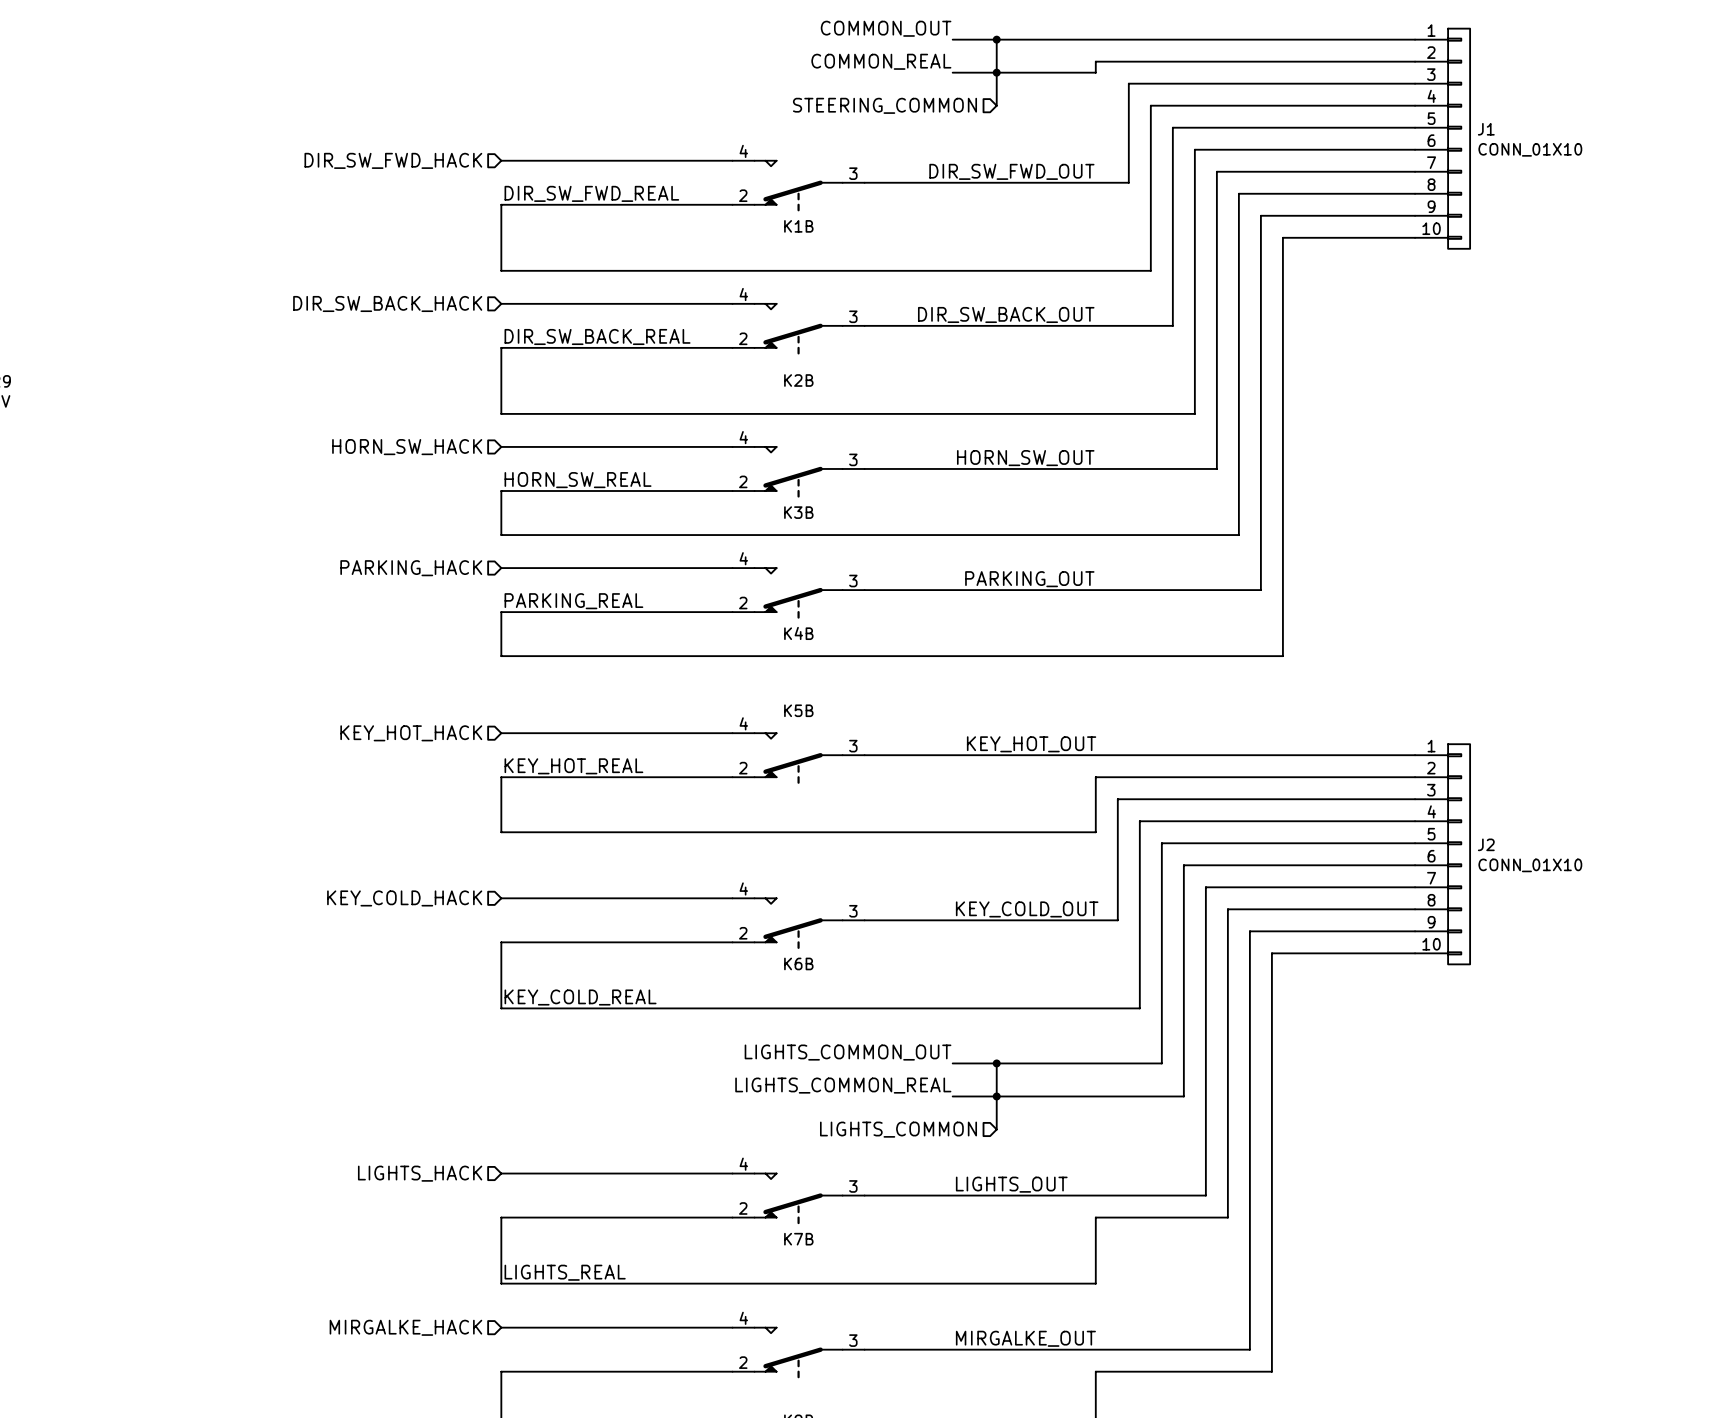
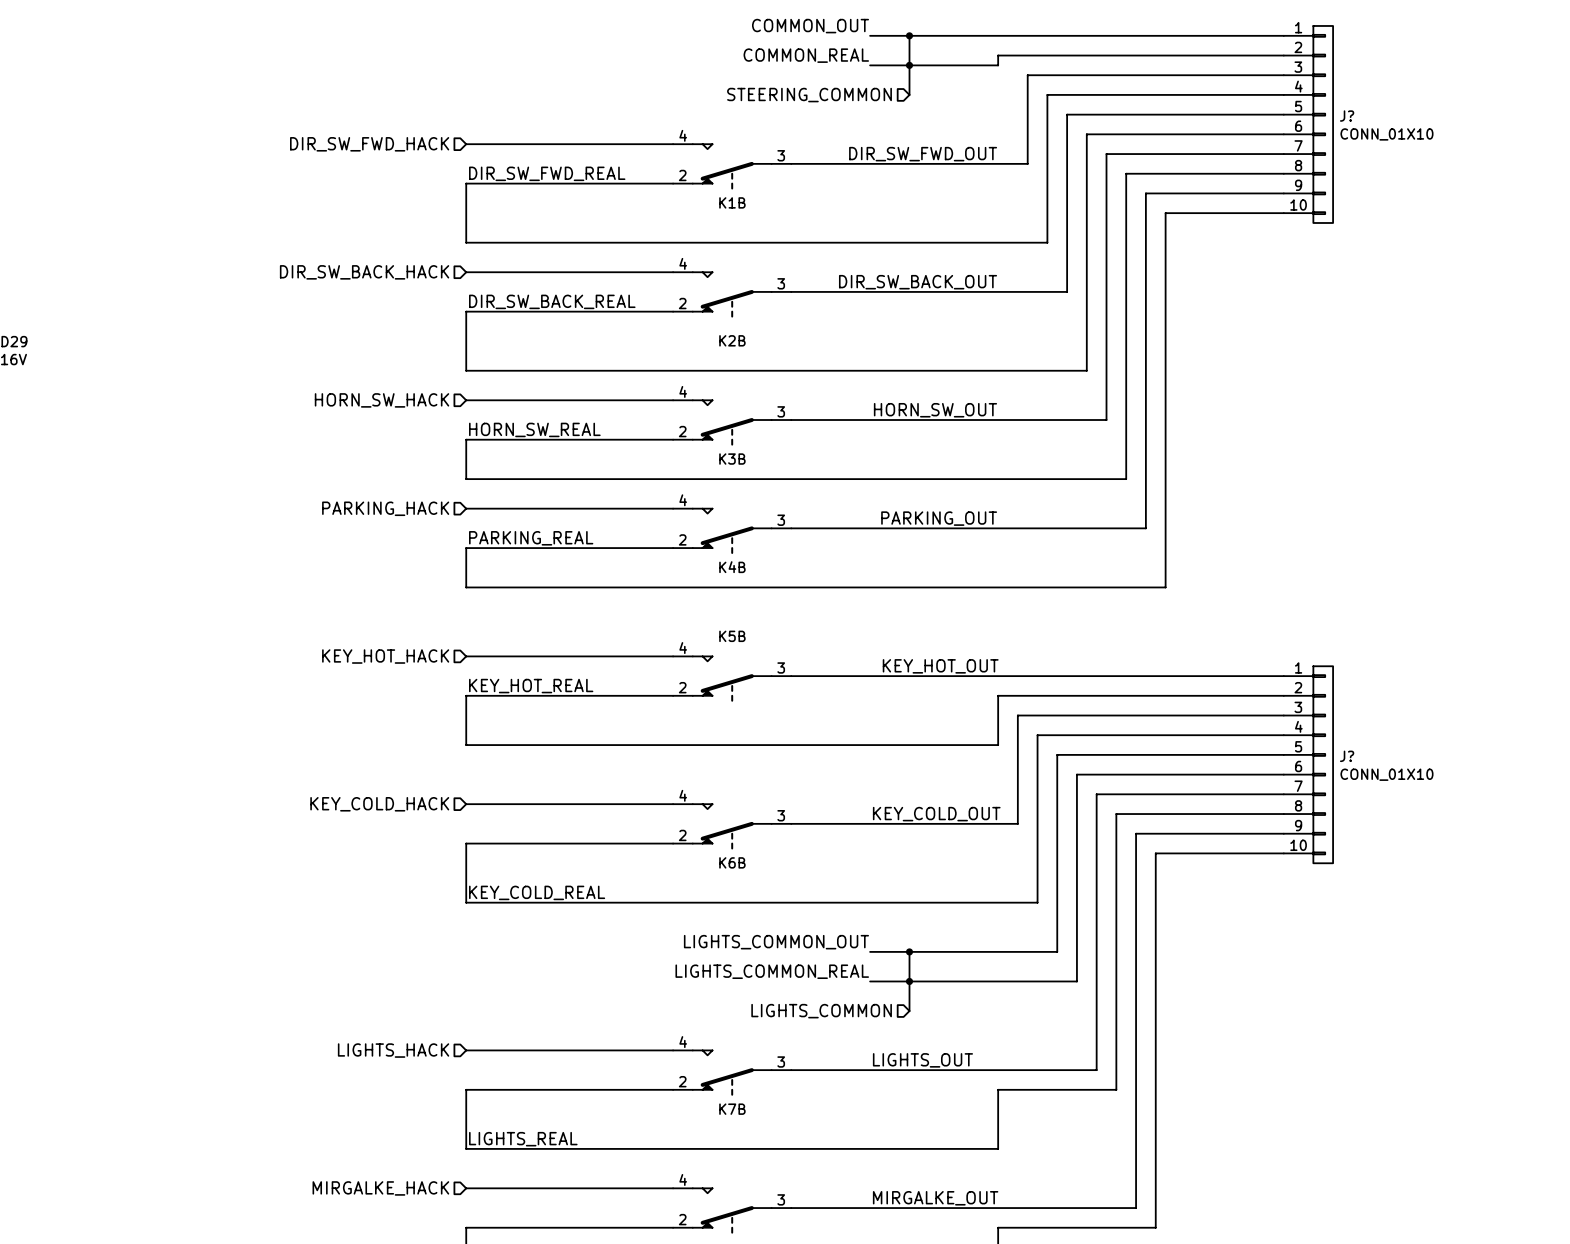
J1 name: J1 (1486, 129) -> J? (1347, 116)
J2 name: J2 (1486, 844) -> J? (1347, 756)

